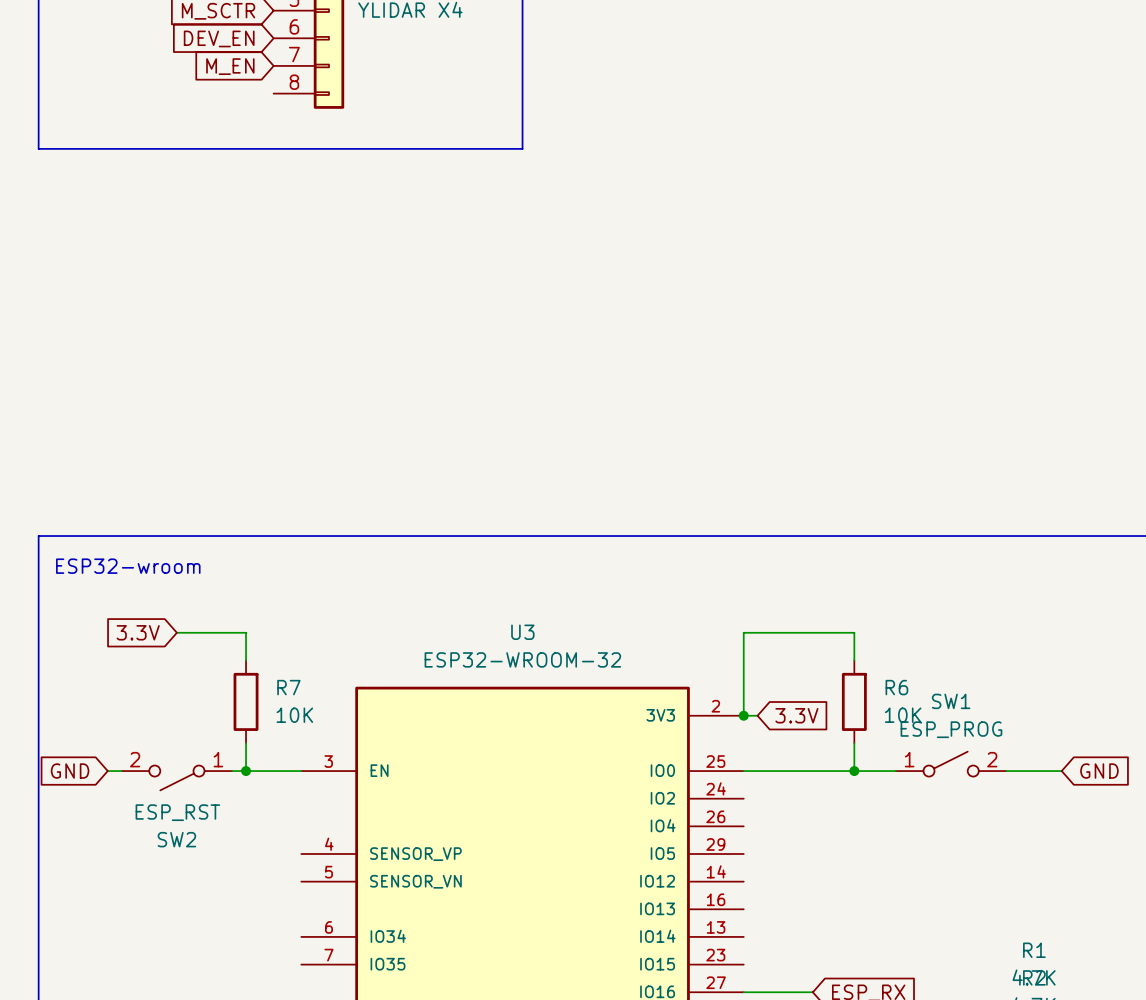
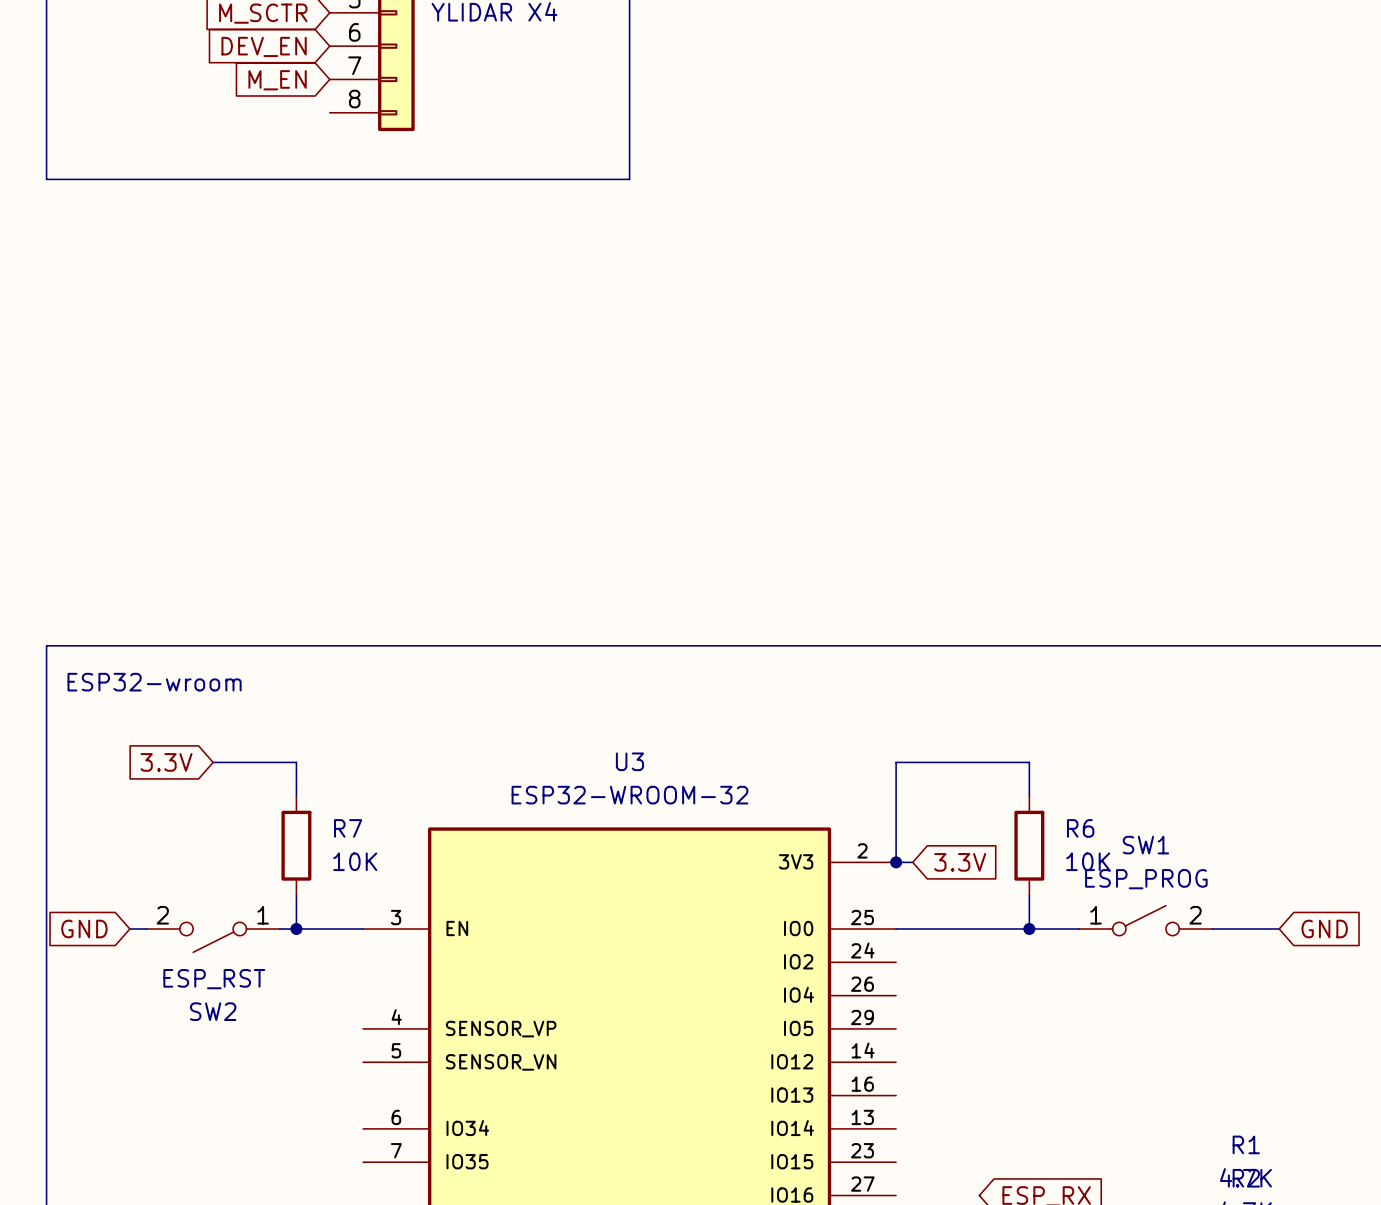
wire: (743, 992) (812, 992) -> none

